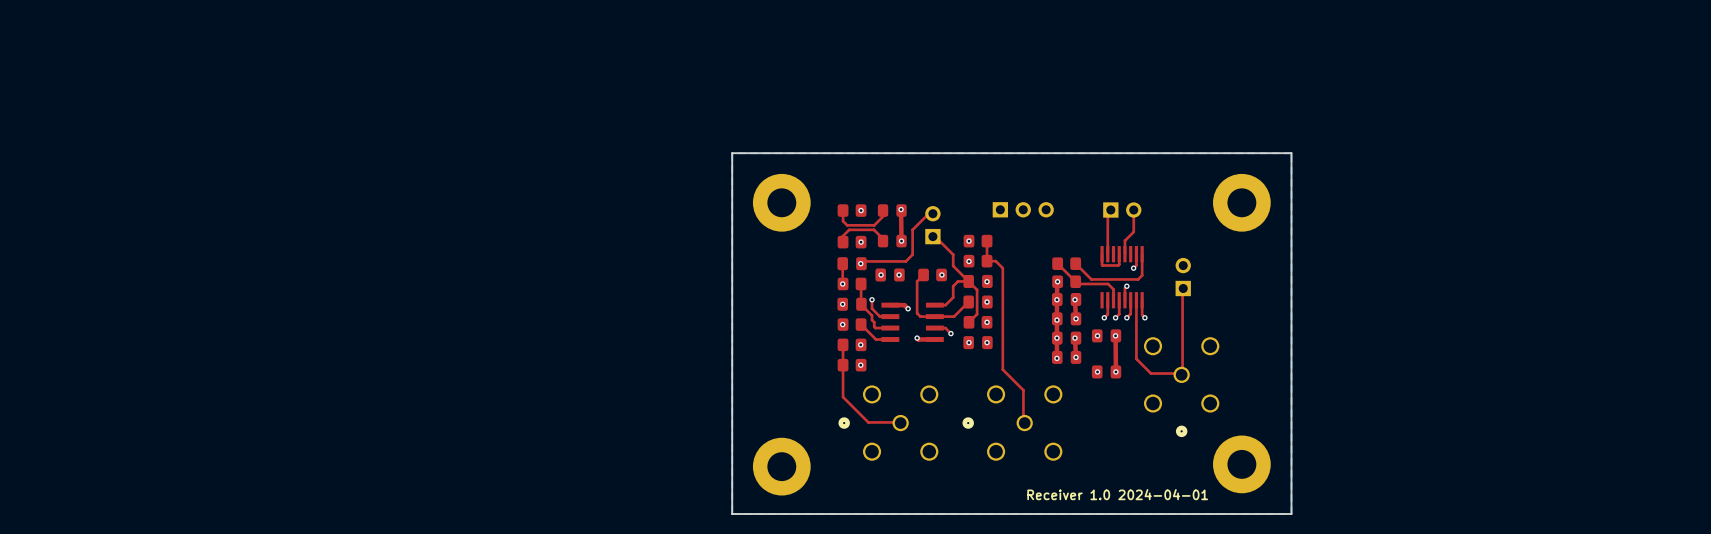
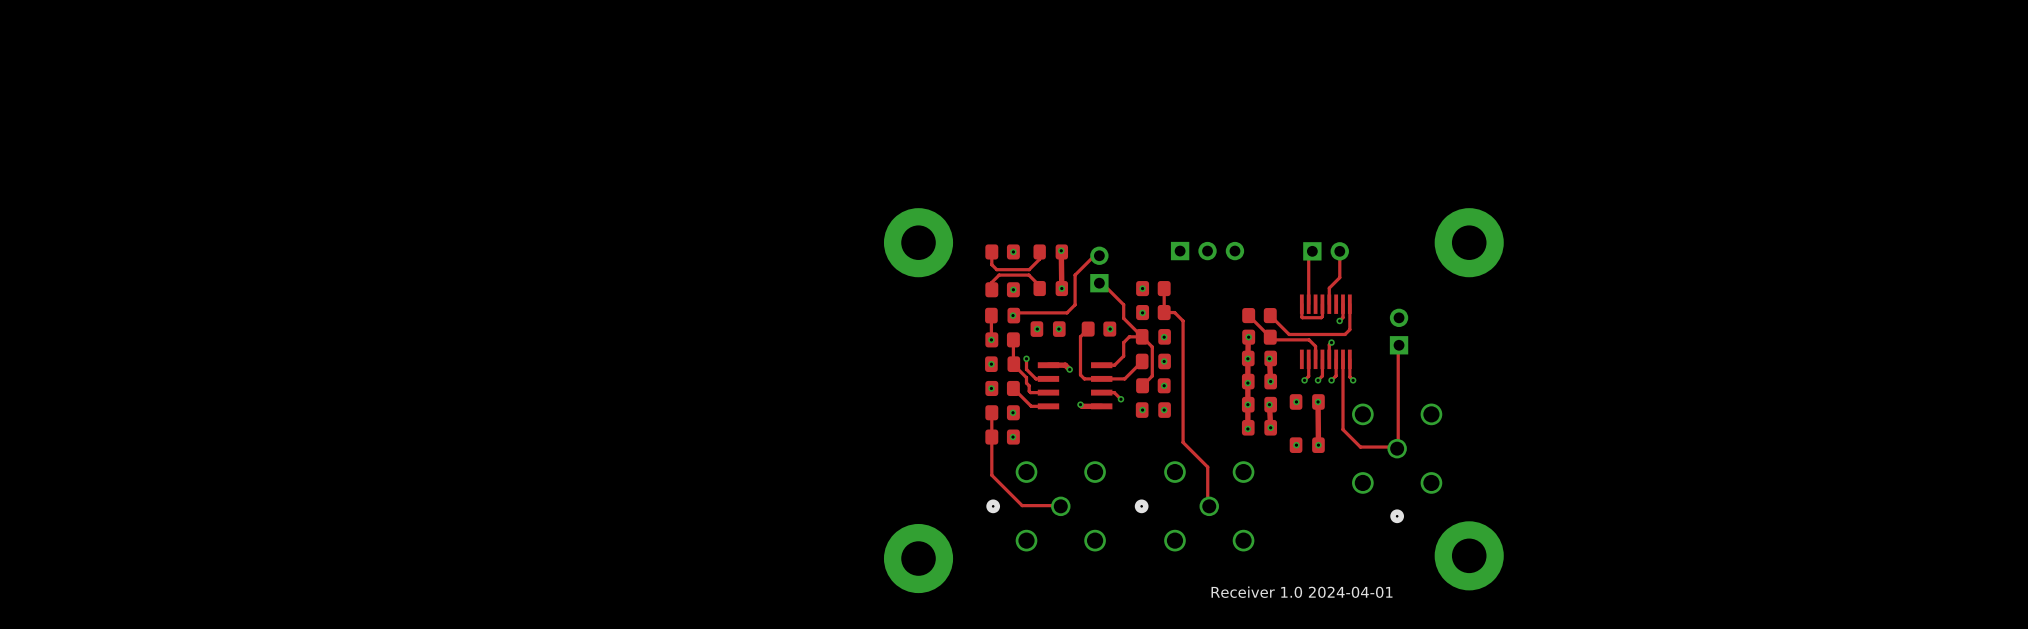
board edge: (1291, 153) (732, 153) (732, 514) (1291, 514) (1291, 153) -> none

